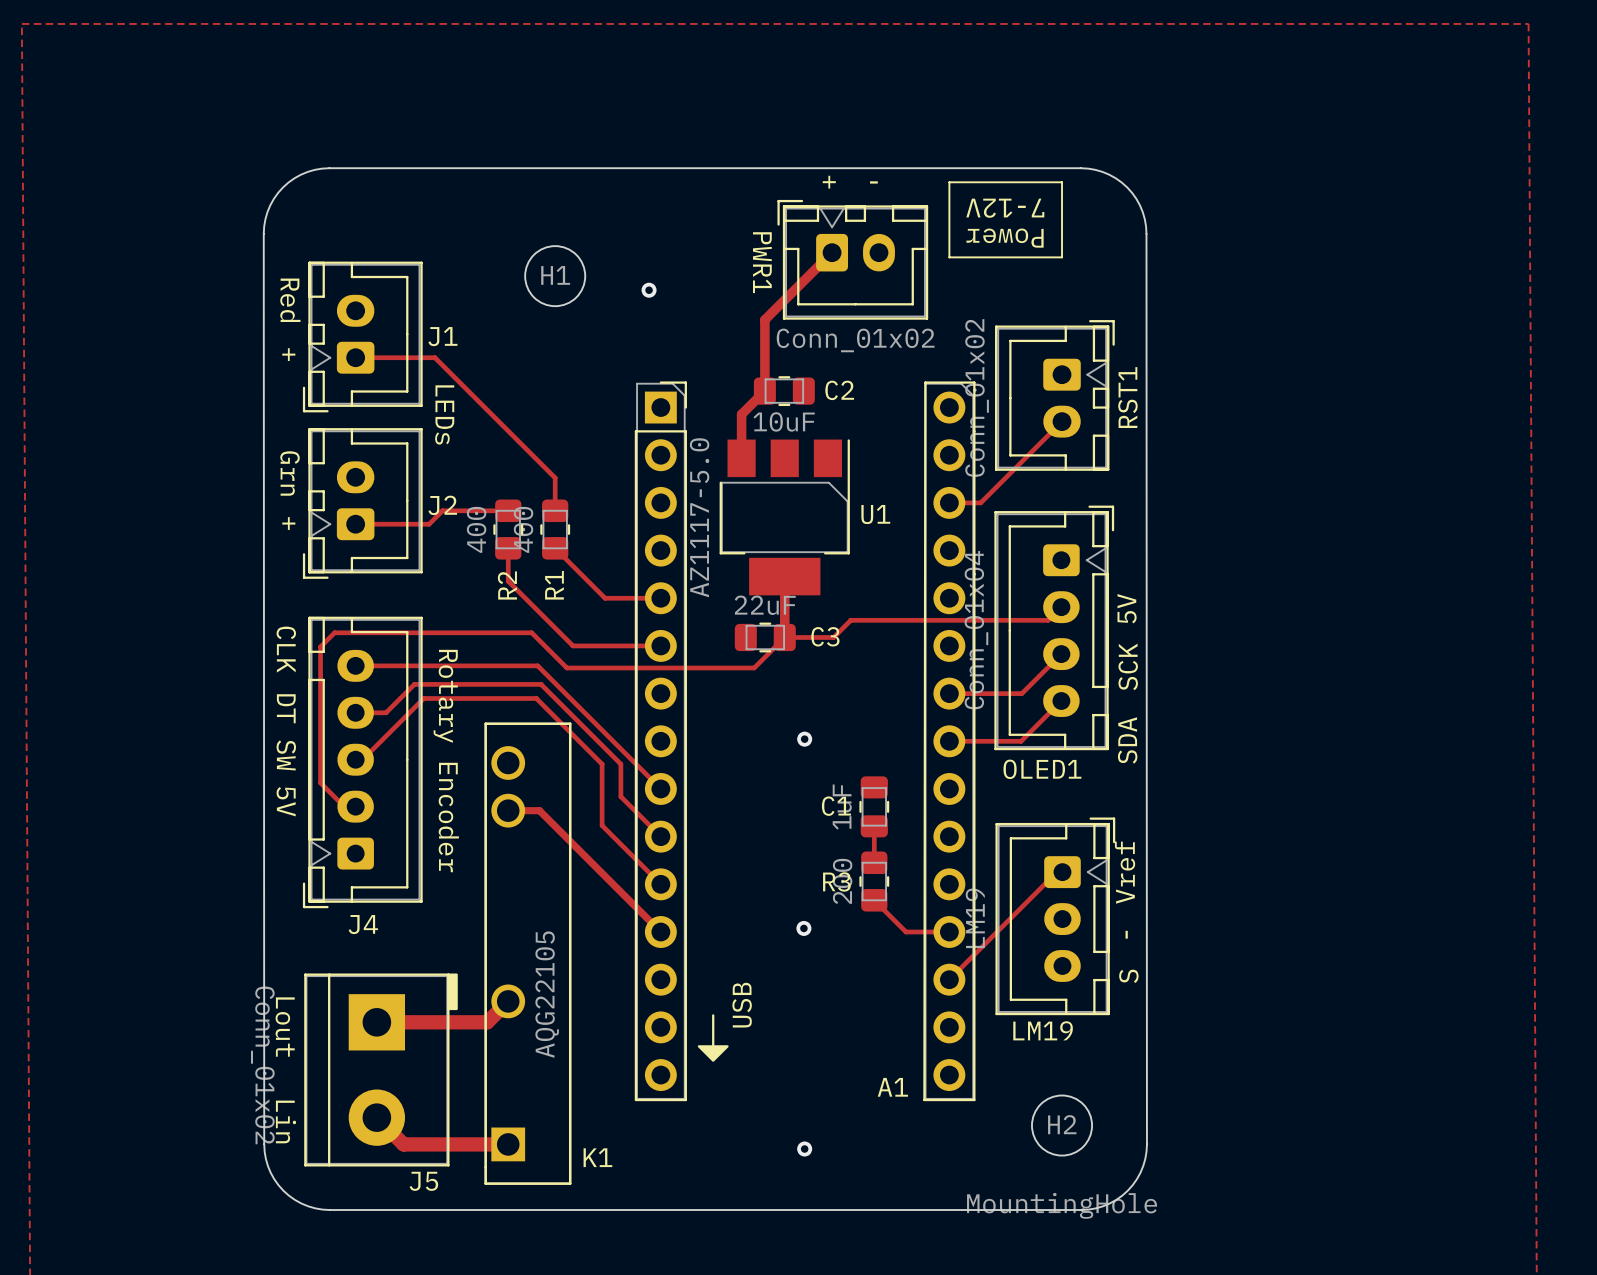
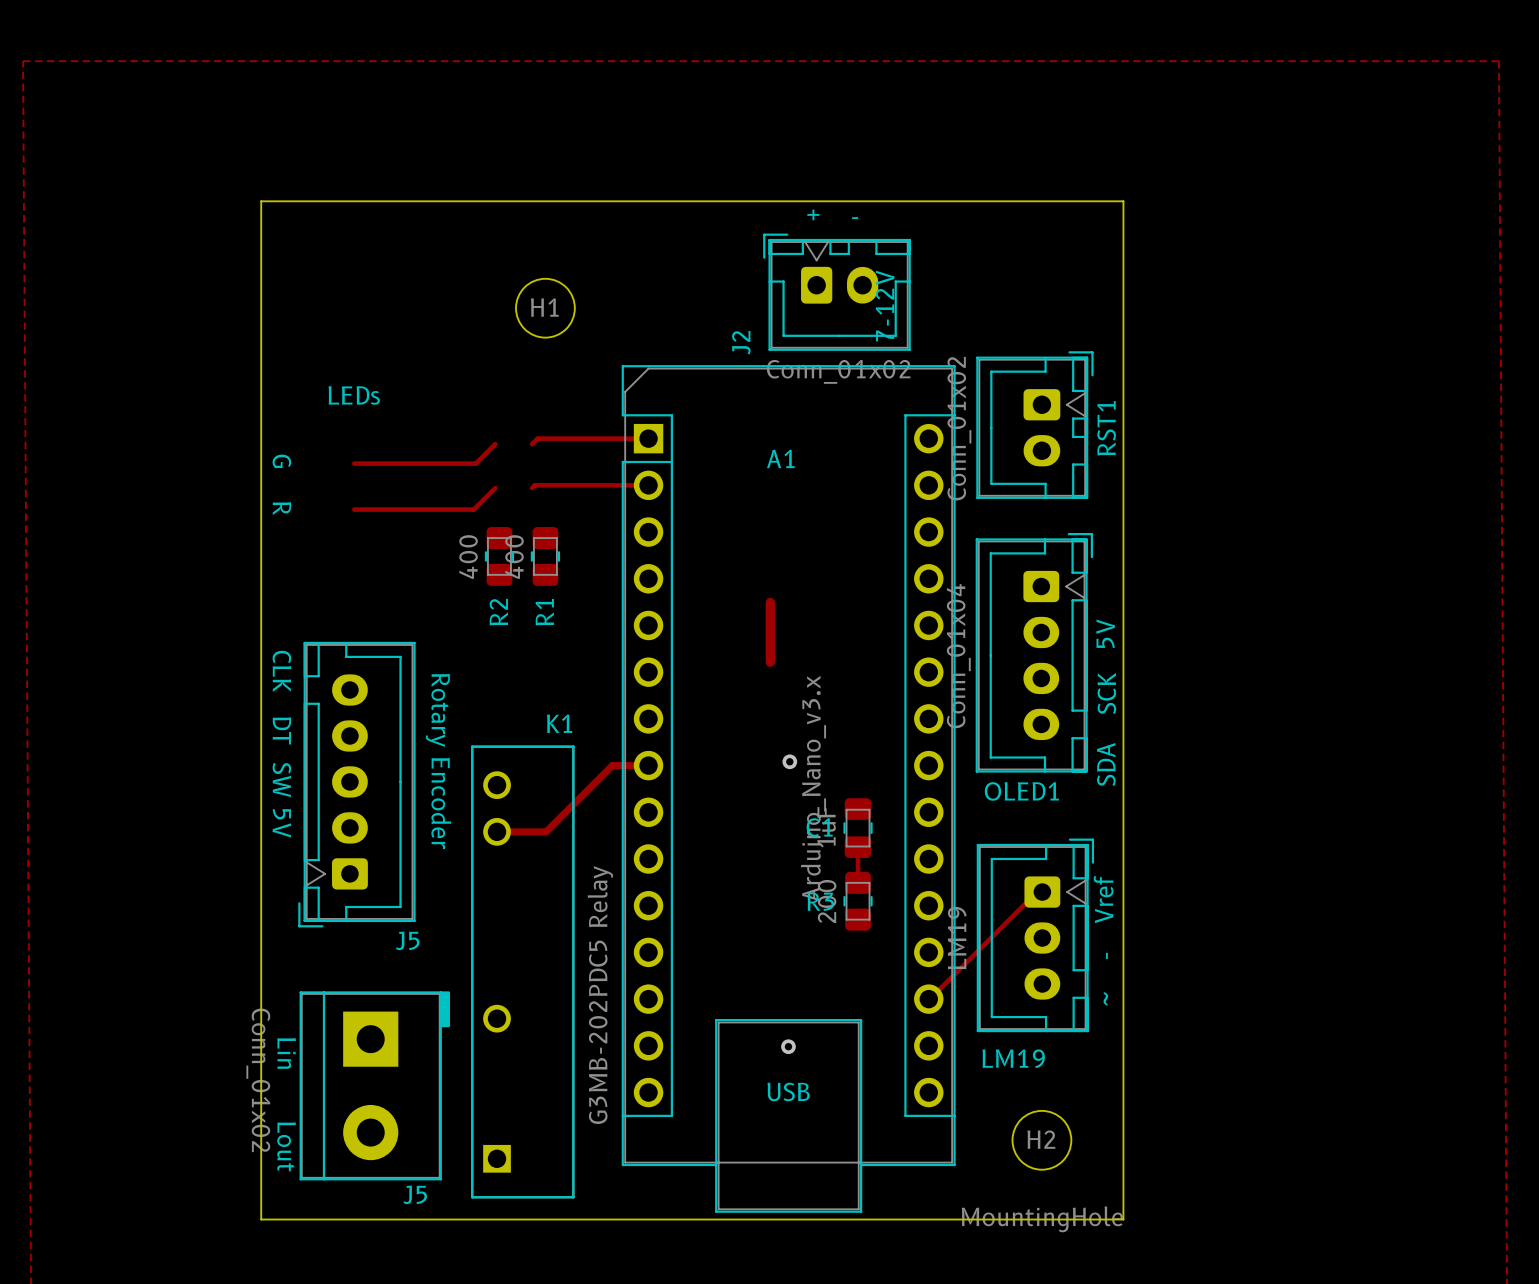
board edge: (329, 168) (1080, 168) (1095, 169) (1109, 174) (1121, 182) (1132, 192) (1142, 212) (1146, 233) (1146, 1144) (1145, 1158) (1140, 1172) (1132, 1185) (1122, 1195) (1102, 1206) (1081, 1210) (329, 1210) (315, 1208) (301, 1203) (288, 1195) (278, 1185) (267, 1166) (264, 1144) (263, 233) (267, 212) (273, 198) (283, 187) (294, 178) (307, 171) (329, 168) -> (261, 201) (261, 1219) (1123, 1219) (1123, 201) (261, 201)
line: (949, 182) (1062, 182) (1062, 257) (949, 257) (949, 182) -> none
text rotation: 0° (1005, 208) -> 90° clockwise (885, 306)
text position: 7-12V (1005, 208) -> 7-12V (885, 306)
text: Power (1005, 238) -> none
track: (832, 252) (764, 319) (764, 391) (741, 414) (741, 458) -> none
PWR1 name: PWR1 (762, 262) -> J2 (741, 342)
via: (649, 290) -> none
text: Red (290, 300) -> none
J1: (362, 336) -> none
text: + (288, 354) -> none
track: (355, 357) (434, 357) (555, 477) (555, 510) -> none
A1 footprint: [634, 381, 976, 1102] -> [621, 365, 956, 1213]
C2: 10uF (784, 391) -> none
track: none -> (648, 438) (537, 438) (532, 444)
text rotation: 0° (444, 414) -> 90° counterclockwise (354, 395)
text position: LEDs (444, 414) -> LEDs (354, 395)
track: none -> (495, 444) (475, 463) (354, 463)
track: (1062, 421) (980, 502) (949, 502) -> none
text: none -> G (281, 461)
track: none -> (648, 485) (534, 485) (532, 488)
track: none -> (495, 488) (473, 509) (354, 509)
text: Grn (290, 473) -> none
text: none -> R (281, 508)
J2: (362, 503) -> none
track: (508, 510) (442, 510) (429, 524) (355, 524) -> none
U1: AZ1117-5.0 (784, 517) -> none
text: + (288, 523) -> none
track: (508, 548) (508, 581) (573, 645) (660, 645) -> none
track: (555, 548) (605, 598) (660, 598) -> none
track: (1061, 607) (1048, 620) (850, 620) (833, 637) (784, 637) (754, 667) (566, 667) (531, 632) (334, 632) (320, 646) (320, 782) (344, 806) (355, 806) -> none
C3: 22uF (765, 637) -> none
track: (1061, 654) (1021, 693) (949, 693) -> none
track: (355, 665) (537, 665) (660, 788) -> none
track: (1061, 701) (1021, 741) (949, 741) -> none
track: (355, 712) (386, 712) (414, 684) (541, 684) (620, 764) (620, 796) (660, 836) -> none
K1 footprint: [484, 722, 572, 1185] -> [471, 745, 575, 1199]
track: (355, 759) (362, 759) (423, 698) (536, 698) (602, 764) (602, 825) (660, 884) -> none
A1 value: none -> Arduino_Nano_v3.x (813, 788)
track: (539, 810) (660, 932) -> (530, 831) (546, 831) (612, 765) (648, 765)
track: (874, 900) (906, 932) (949, 932) -> none
J4 name: J4 (363, 924) -> J5 (407, 940)
via: (803, 928) -> none
text: S (1128, 976) -> ~ (1105, 998)
K1 value: AQG22105 (547, 994) -> G3MB-202PDC5 Relay (600, 995)
track: (508, 1001) (487, 1022) (376, 1022) -> none
text position: Lout (285, 1027) -> Lout (286, 1146)
via: none -> (788, 1046)
LM19 name: LM19 (1043, 1030) -> none
text: none -> LM19 (1013, 1058)
A1 name position: A1 (892, 1087) -> A1 (780, 458)
track: (376, 1117) (403, 1144) (508, 1144) -> none
text position: Lin (285, 1121) -> Lin (286, 1053)
via: (804, 1149) -> none
K1 name position: K1 (597, 1157) -> K1 (559, 723)

